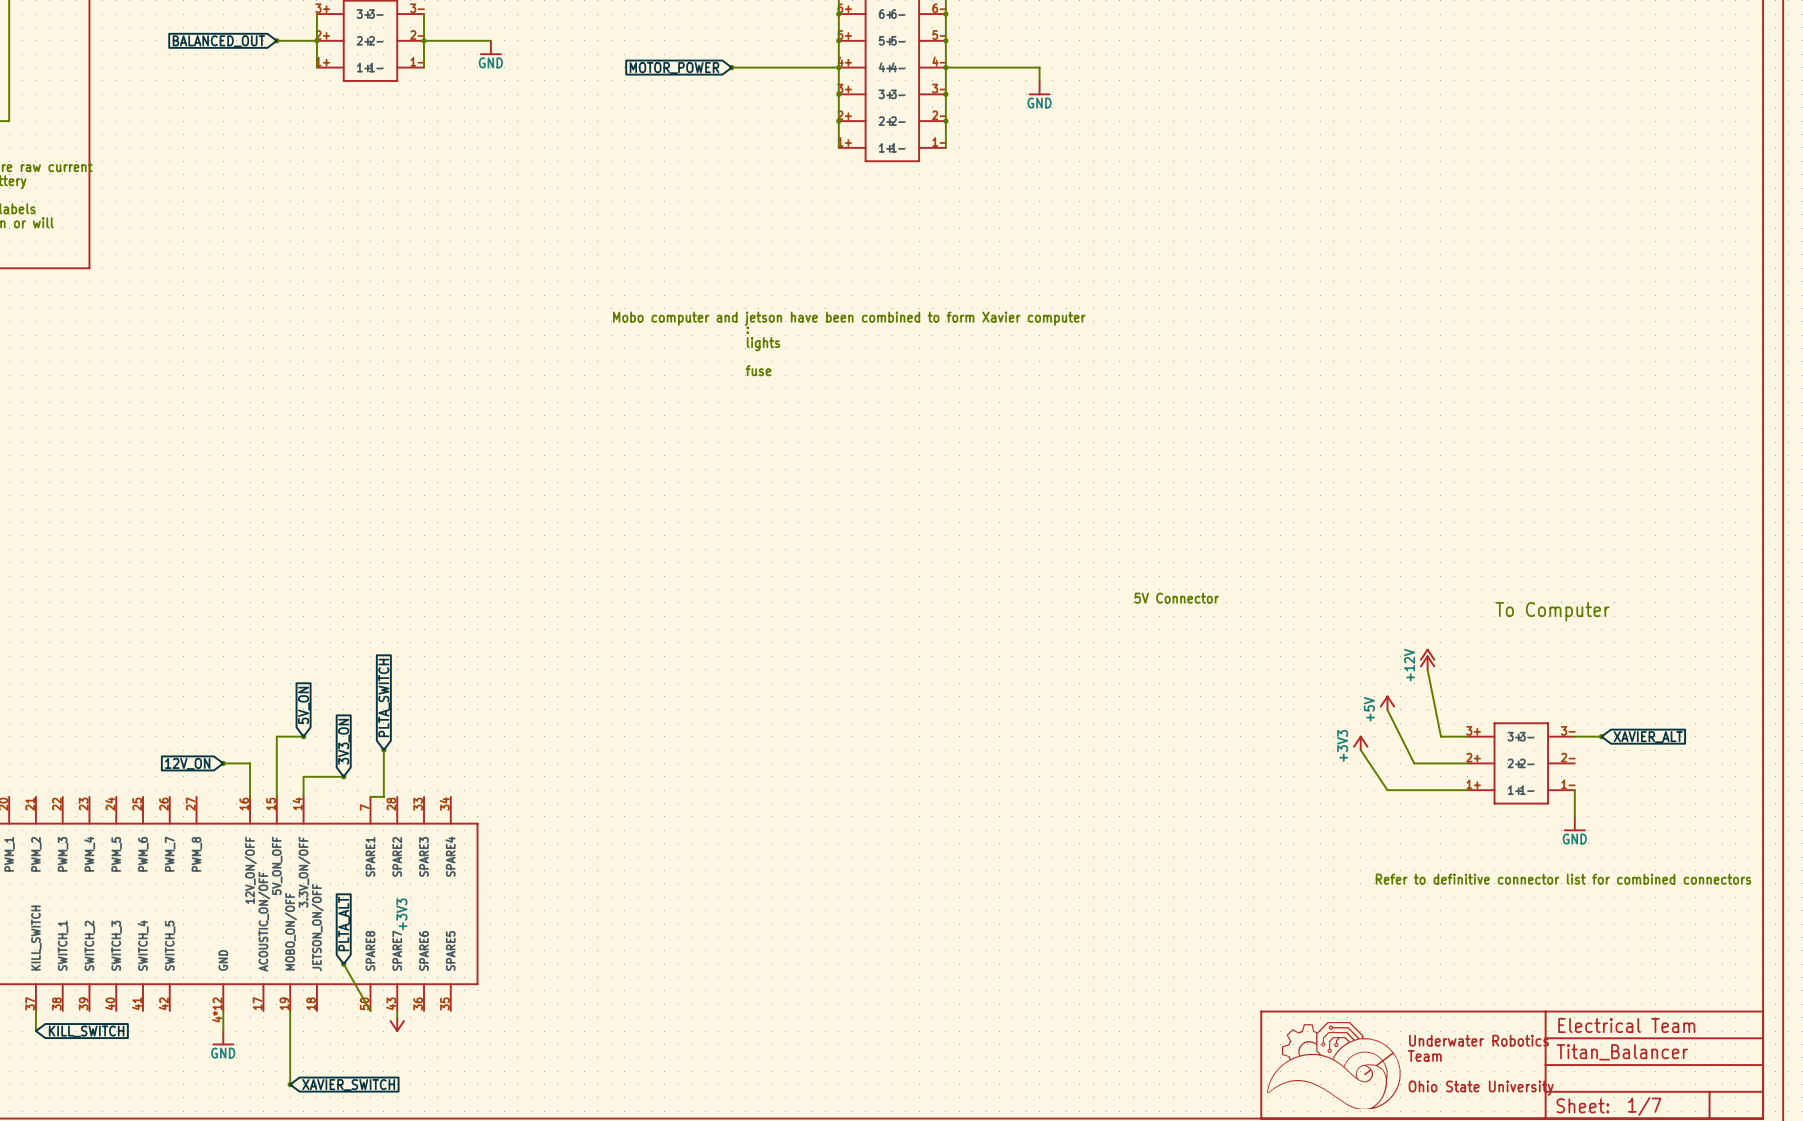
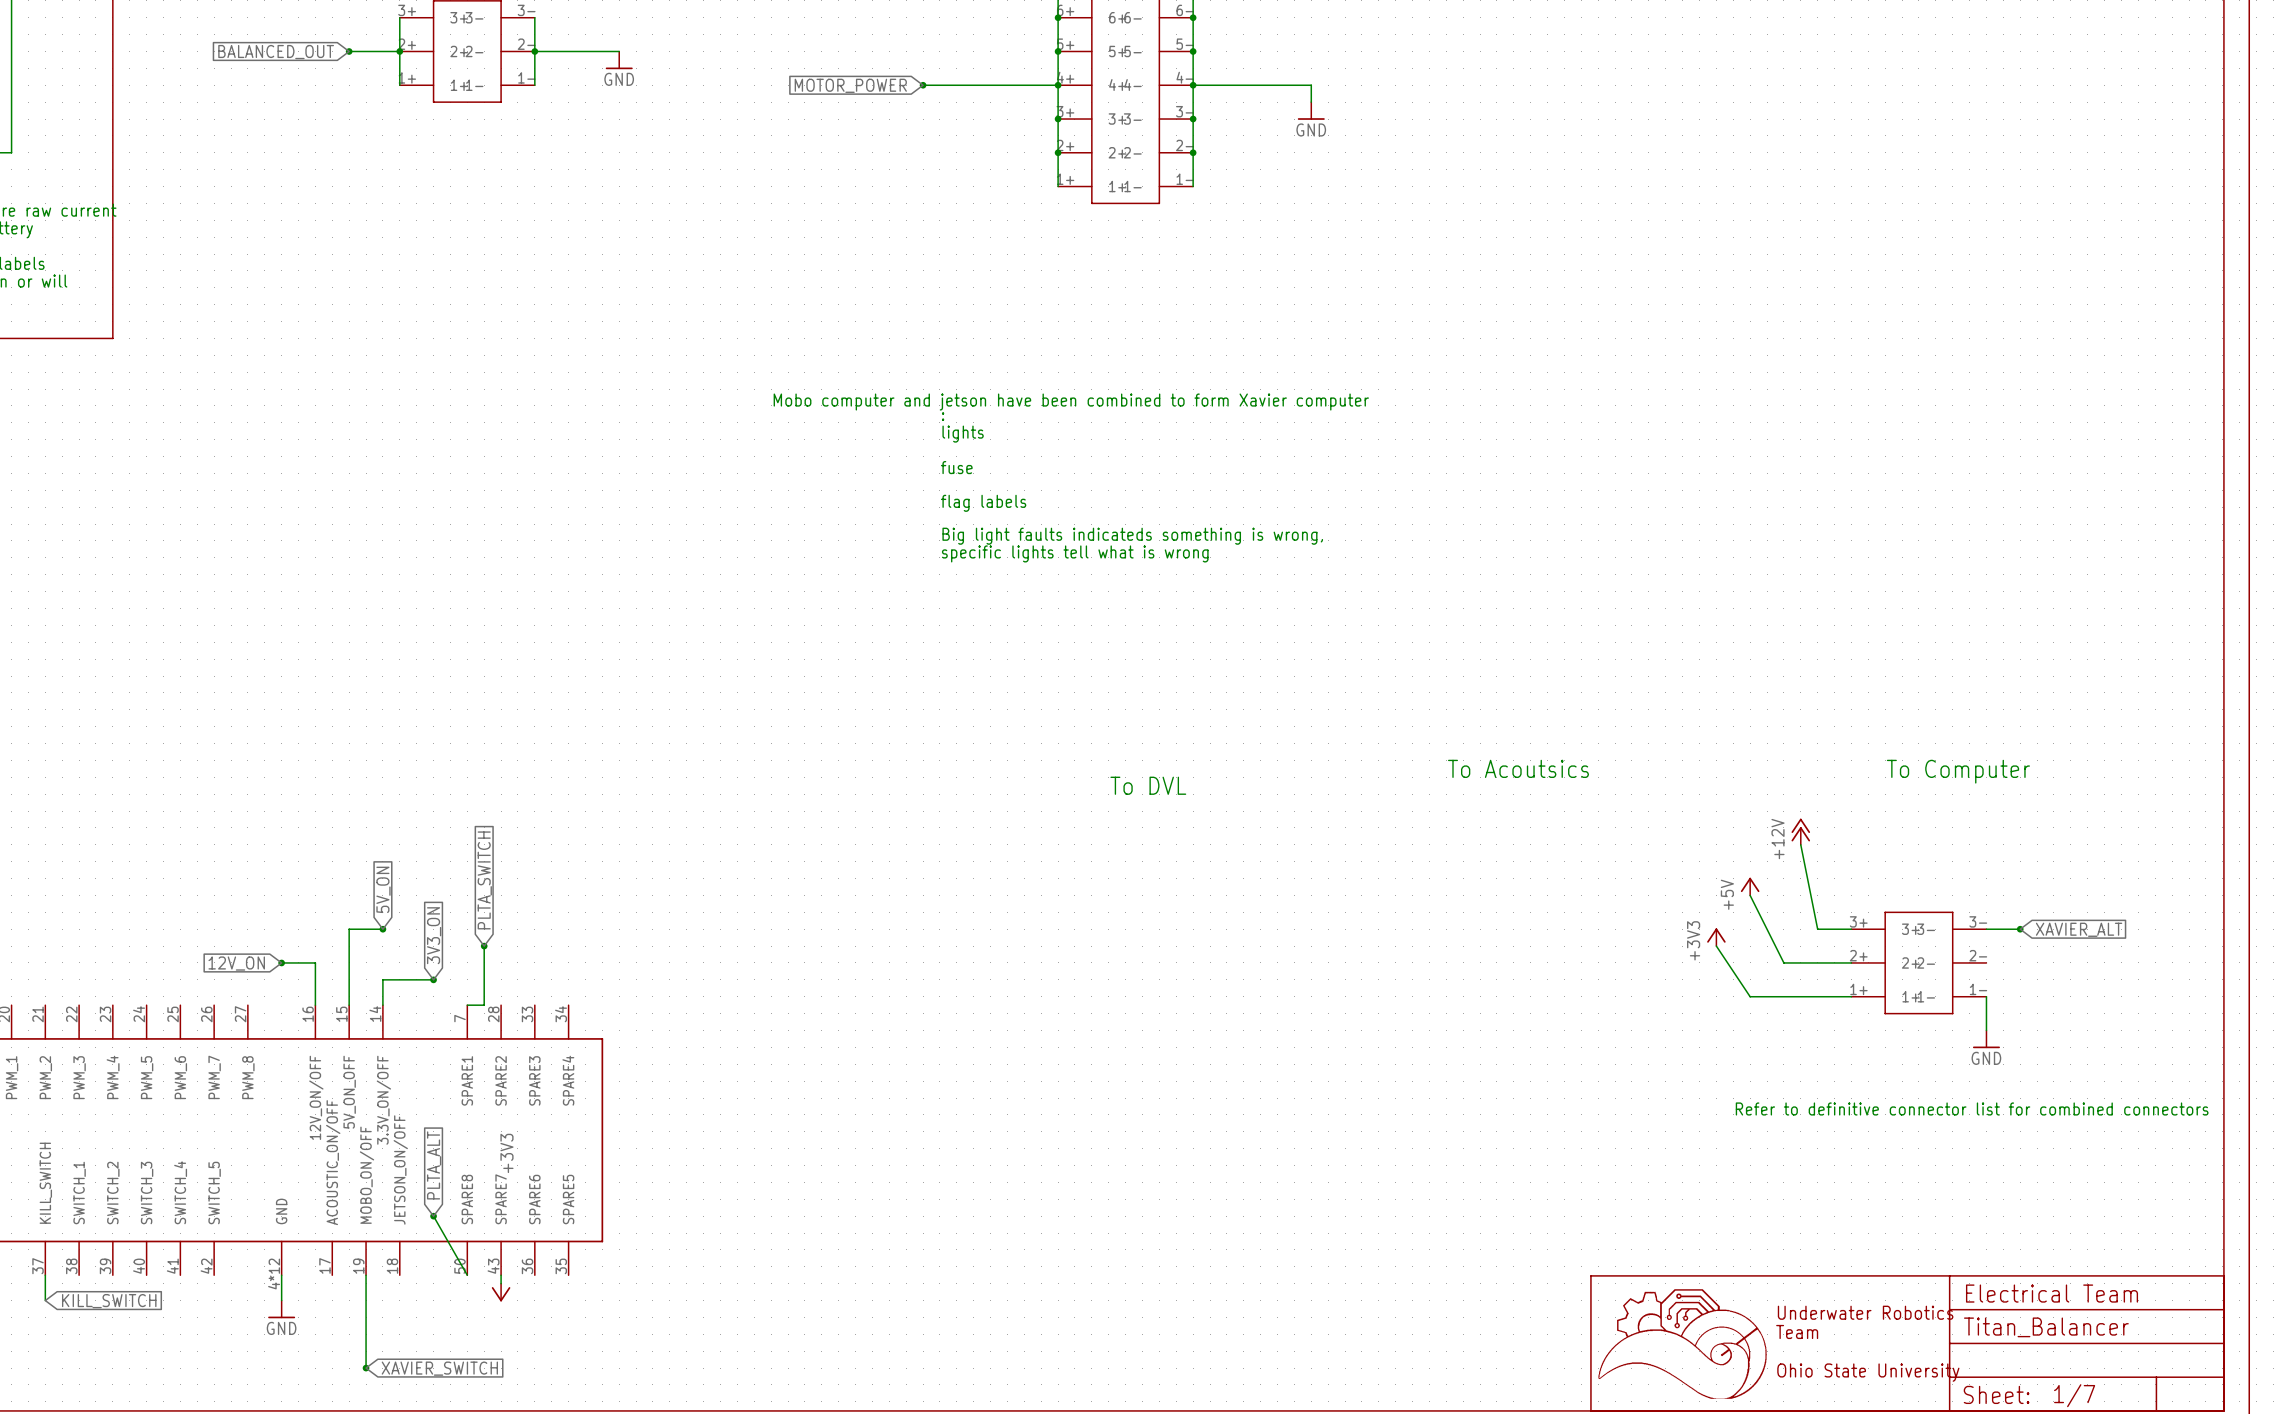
text: none -> flag labels (983, 503)
text: none -> Big light faults indicateds something is wrong, (1132, 536)
text: none -> specific lights tell what is wrong (1075, 553)
text: 5V Connector (1176, 598) -> none
text: none -> To Acoutsics (1518, 768)
text: none -> To DVL (1148, 785)

